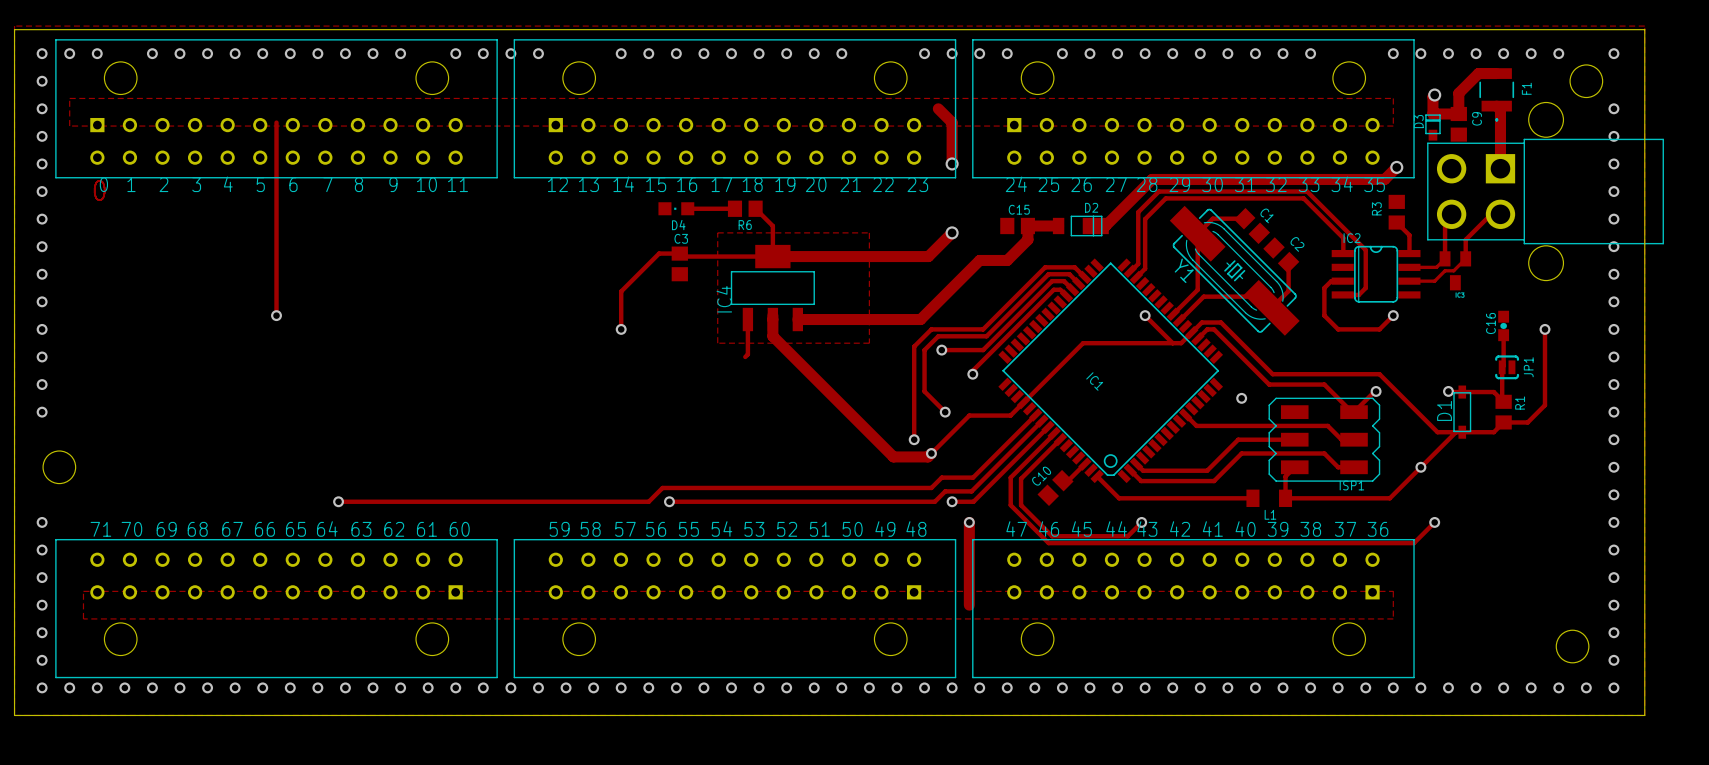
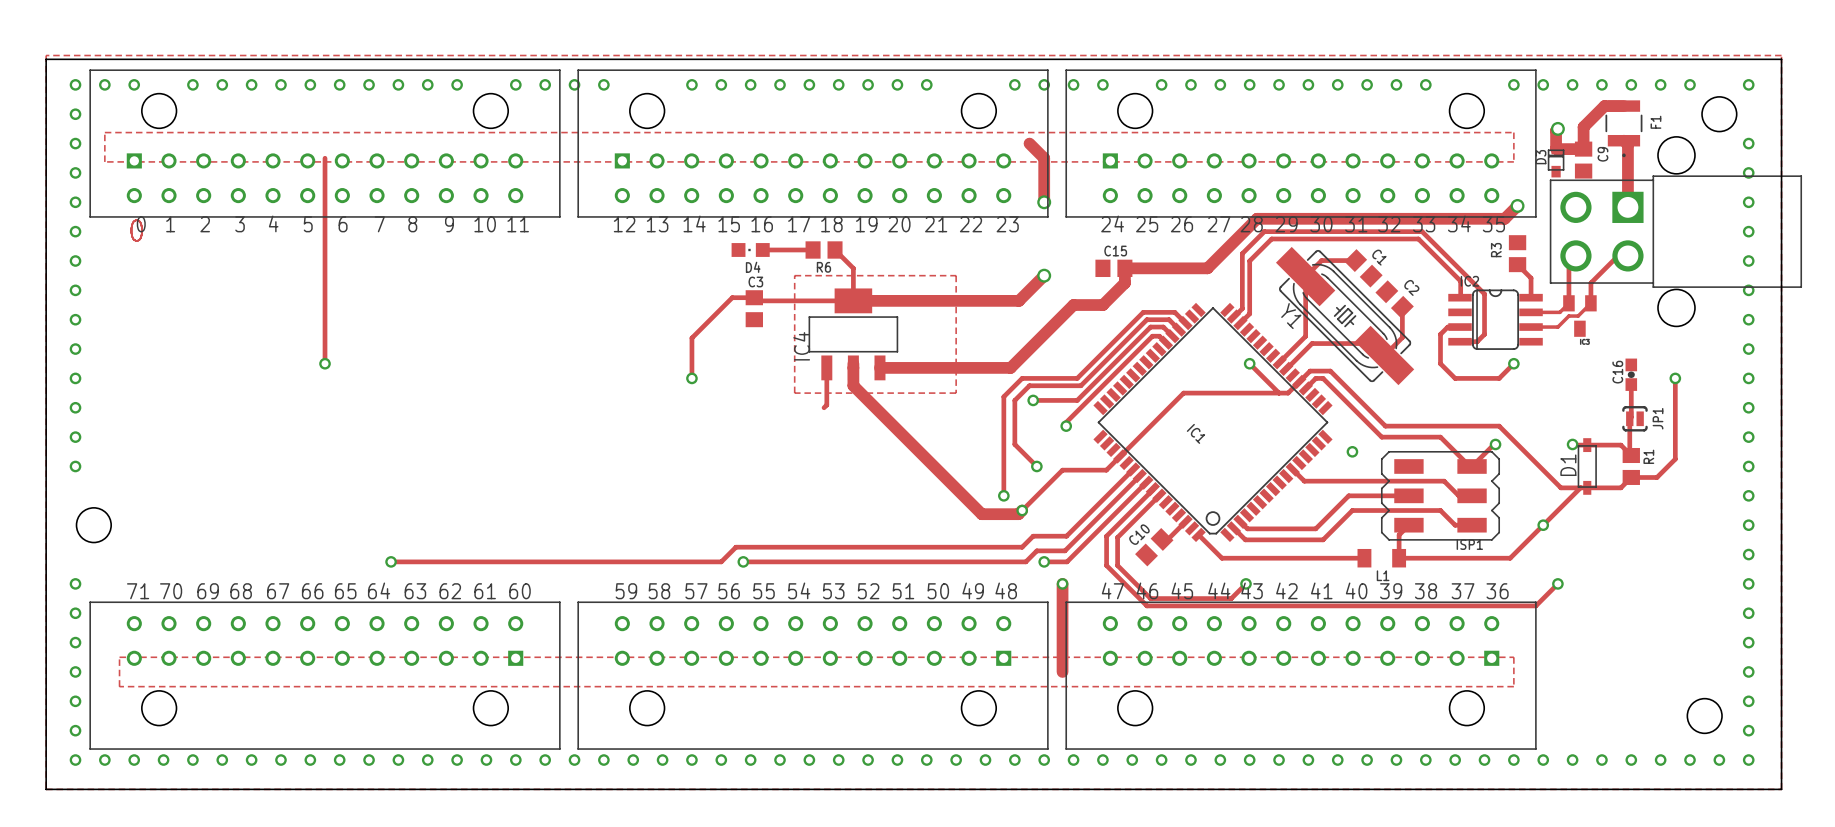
track: none -> (1157, 268) (1197, 268)
D2: (1080, 225) -> none

